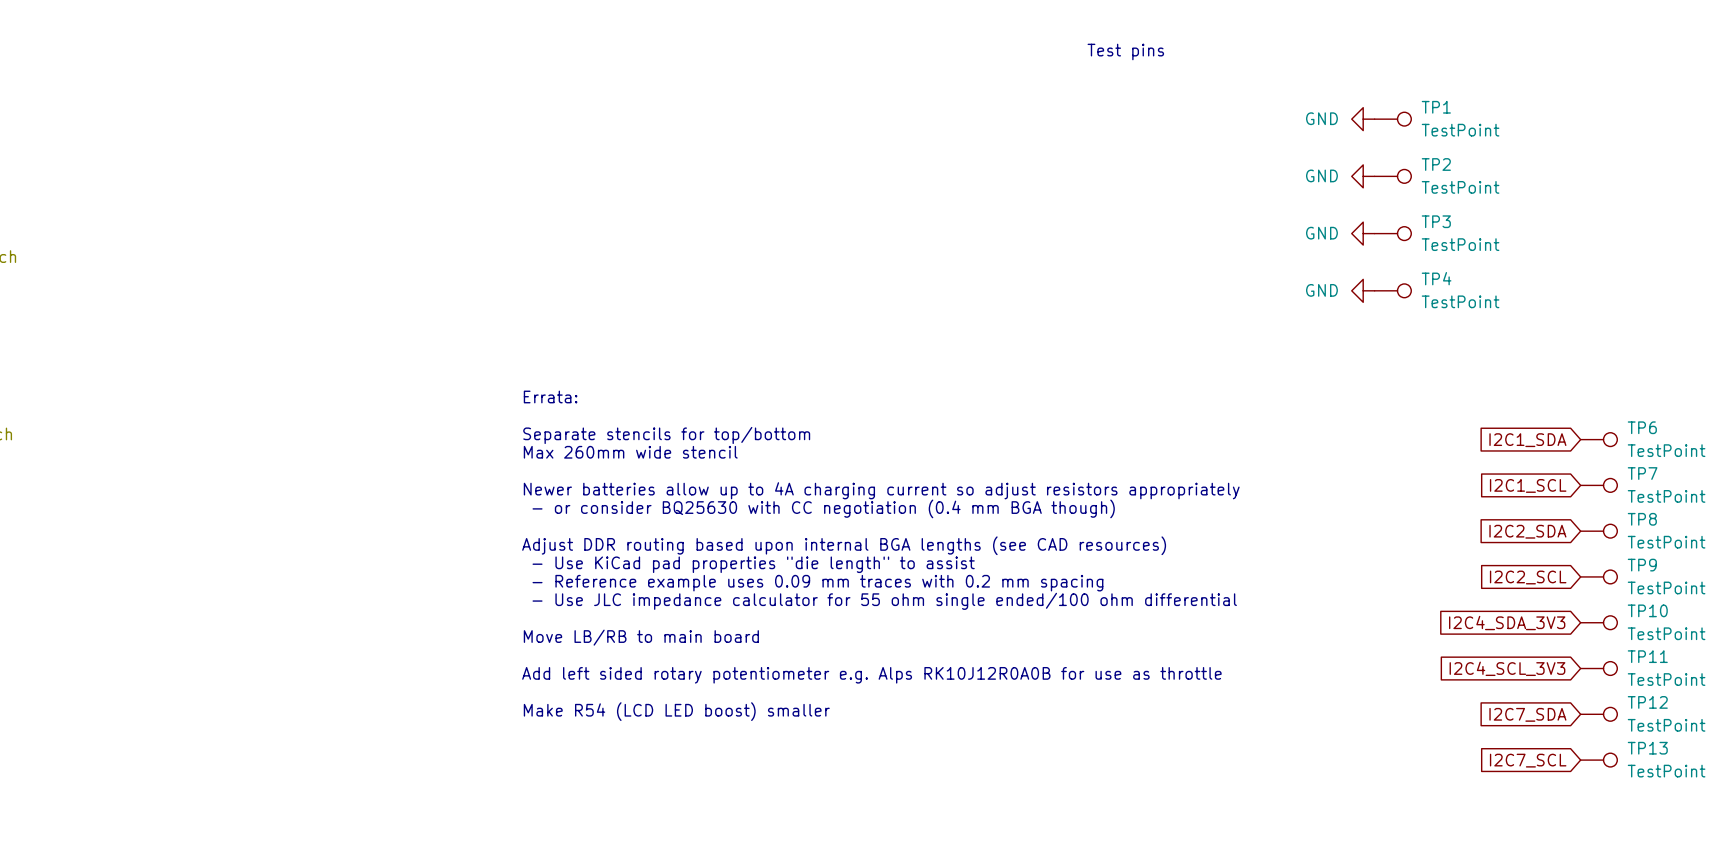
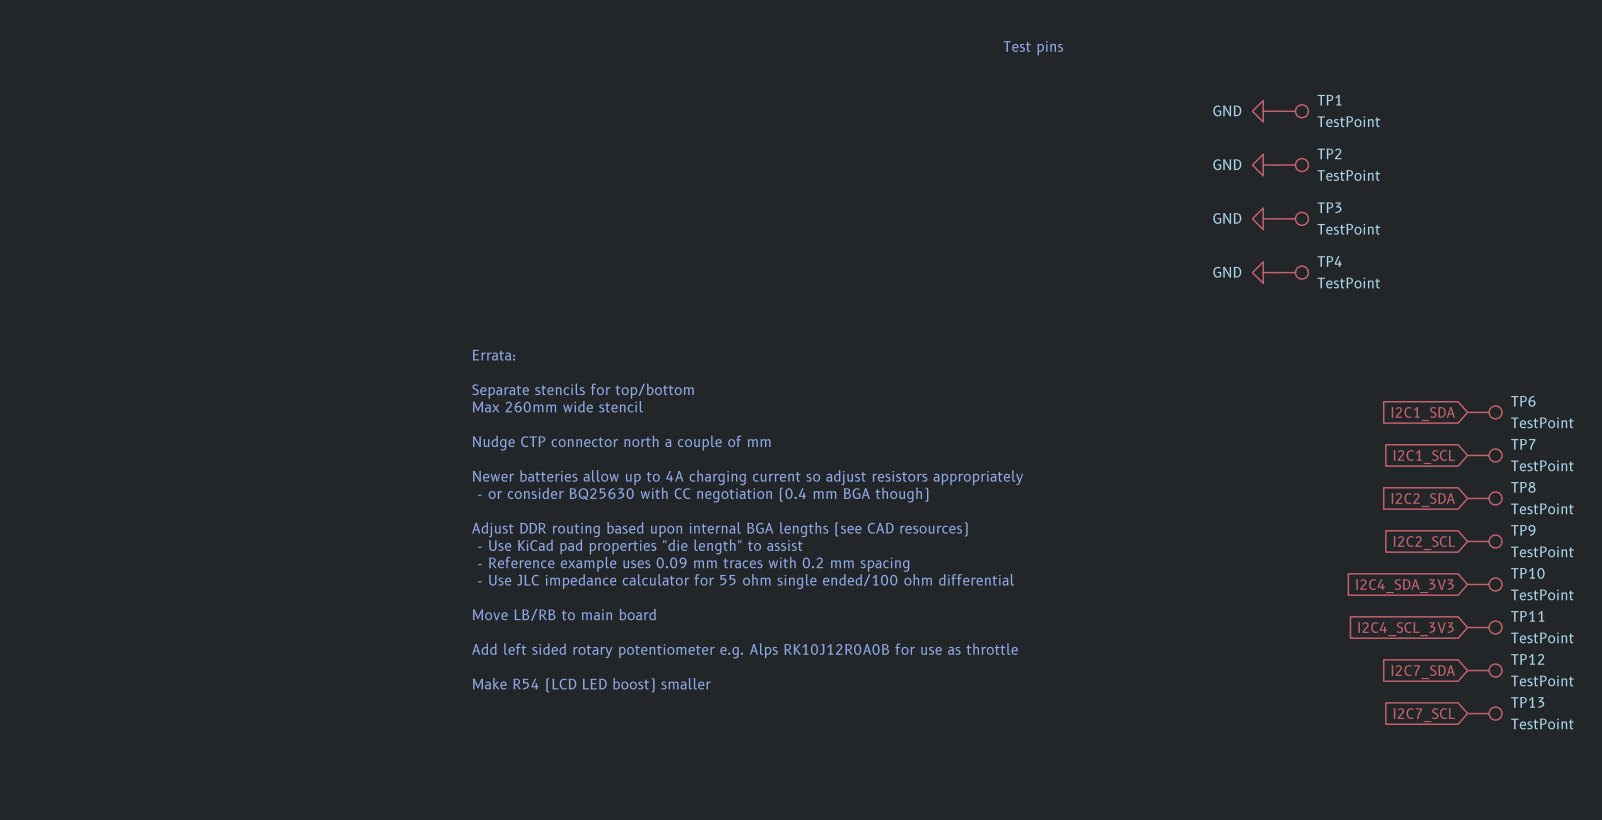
text position: Errata: (550, 396) -> Errata: (493, 355)
text: none -> Separate stencils for top/bottom (583, 391)
text: Separate stencils for top/bottom (666, 435) -> Max 260mm wide stencil (557, 406)
text: Max 260mm wide stencil (630, 452) -> none
text: none -> Nudge CTP connector north a couple of mm (621, 443)
text: Newer batteries allow up to 4A charging current so adjust resistors appropriately (881, 490) -> none
text: - or consider BQ25630 with CC negotiation (0.4 mm BGA though) (823, 508) -> Newer batteries allow up to 4A charging current so adjust resistors appropriately (748, 477)
text: none -> - or consider BQ25630 with CC negotiation (0.4 mm BGA though) (703, 495)
text: Adjust DDR routing based upon internal BGA lengths (see CAD resources) (844, 545) -> none
text: - Use KiCad pad properties "die length" to assist (753, 564) -> Adjust DDR routing based upon internal BGA lengths (see CAD resources) (719, 529)
text: - Reference example uses 0.09 mm traces with 0.2 mm spacing (817, 583) -> - Use KiCad pad properties "die length" to assist (640, 546)
text: - Use JLC impedance calculator for 55 ohm single ended/100 ohm differential (884, 601) -> - Reference example uses 0.09 mm traces with 0.2 mm spacing (693, 564)
text: none -> - Use JLC impedance calculator for 55 ohm single ended/100 ohm differential (746, 581)
text position: Move LB/RB to main board (641, 637) -> Move LB/RB to main board (564, 614)
text position: Add left sided rotary potentiometer e.g. Alps RK10J12R0A0B for use as throttle (871, 675) -> Add left sided rotary potentiometer e.g. Alps RK10J12R0A0B for use as throttle (744, 650)
text position: Make R54 (LCD LED boost) smaller (676, 711) -> Make R54 (LCD LED boost) smaller (591, 685)

